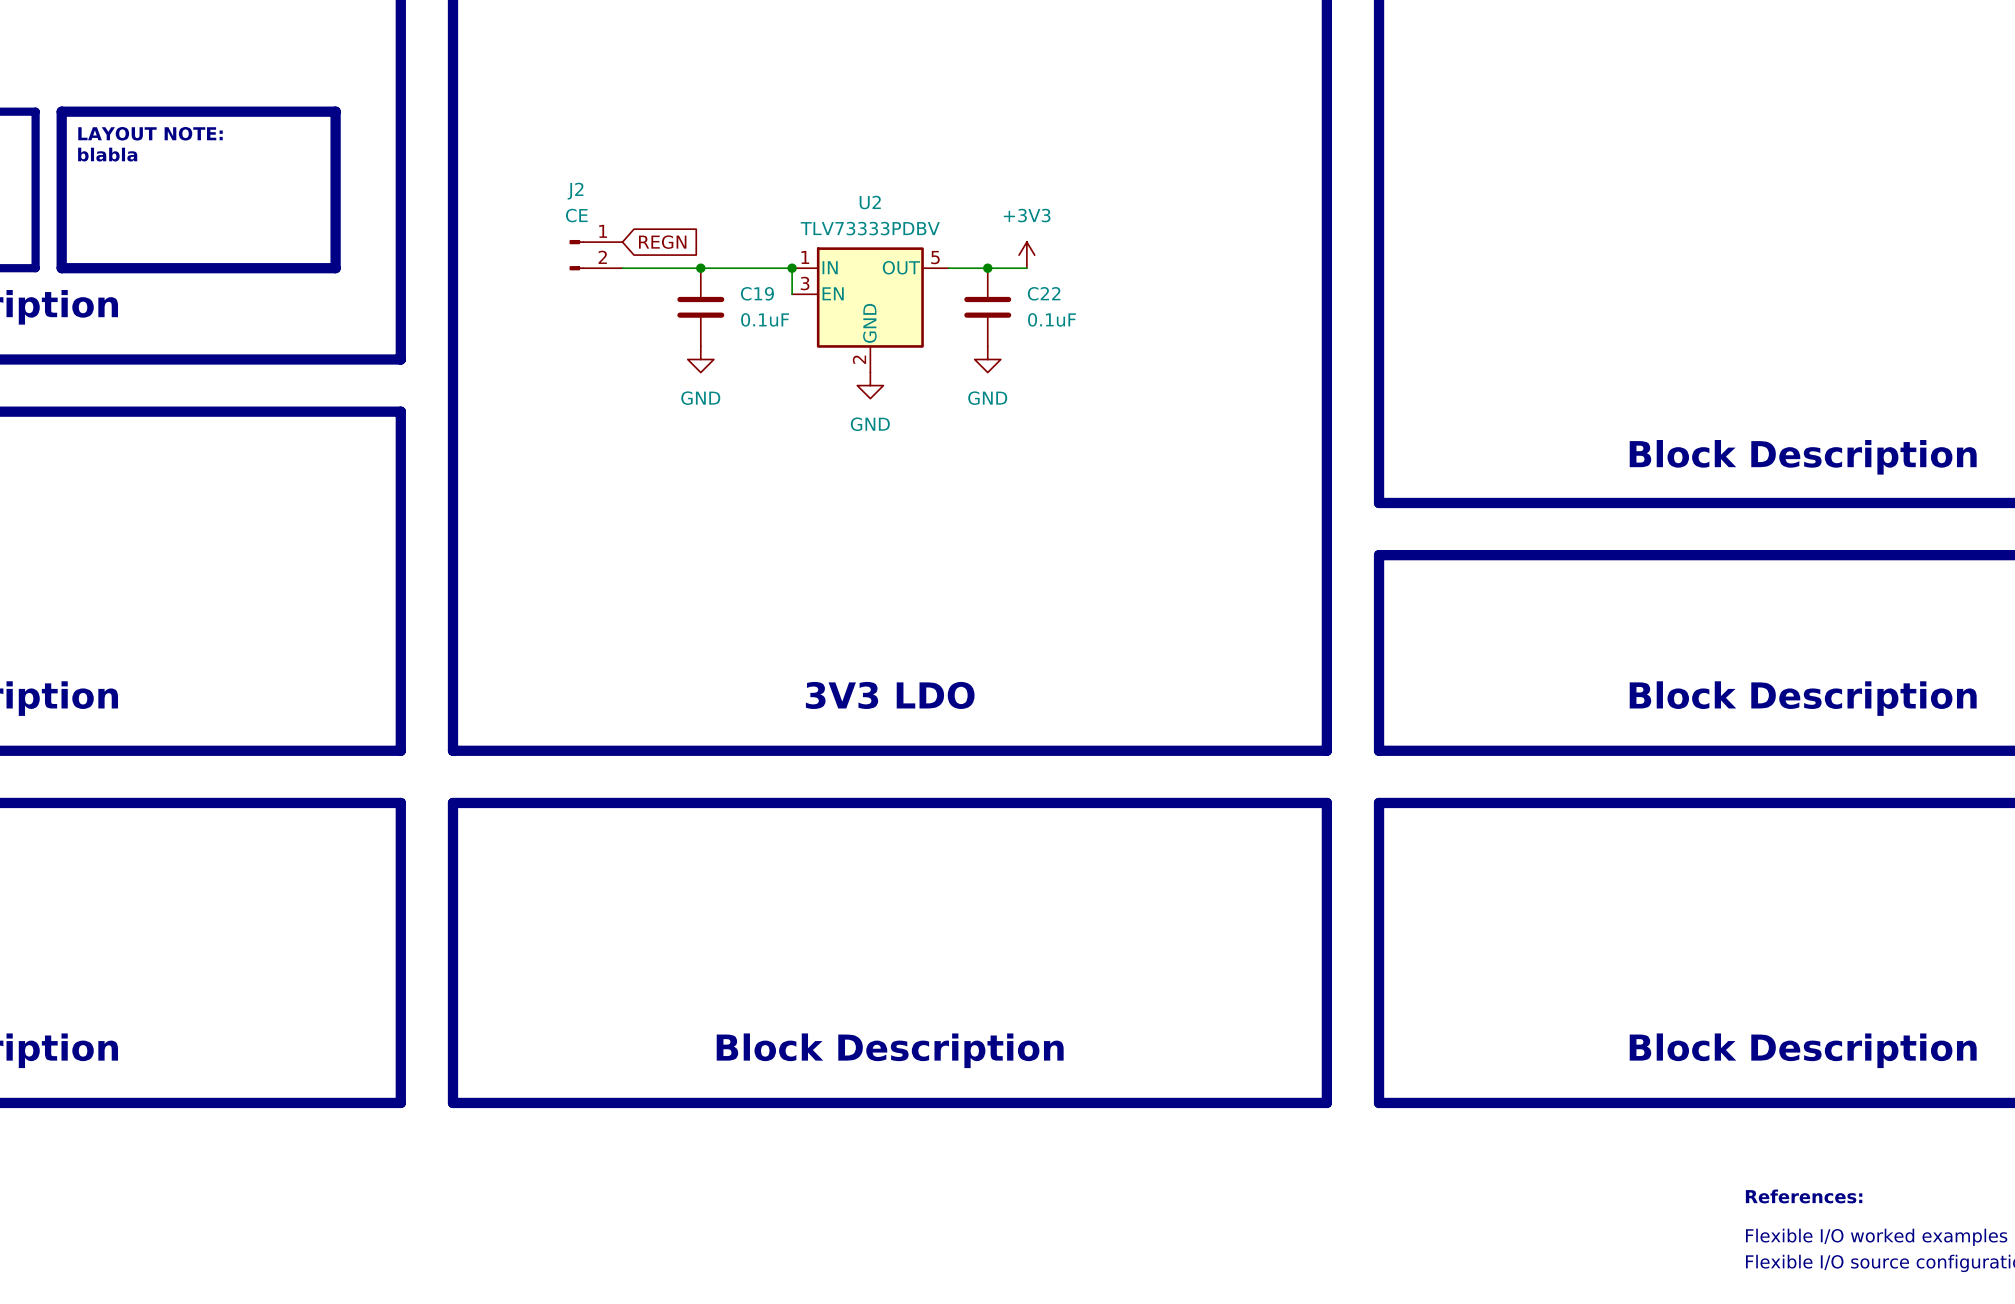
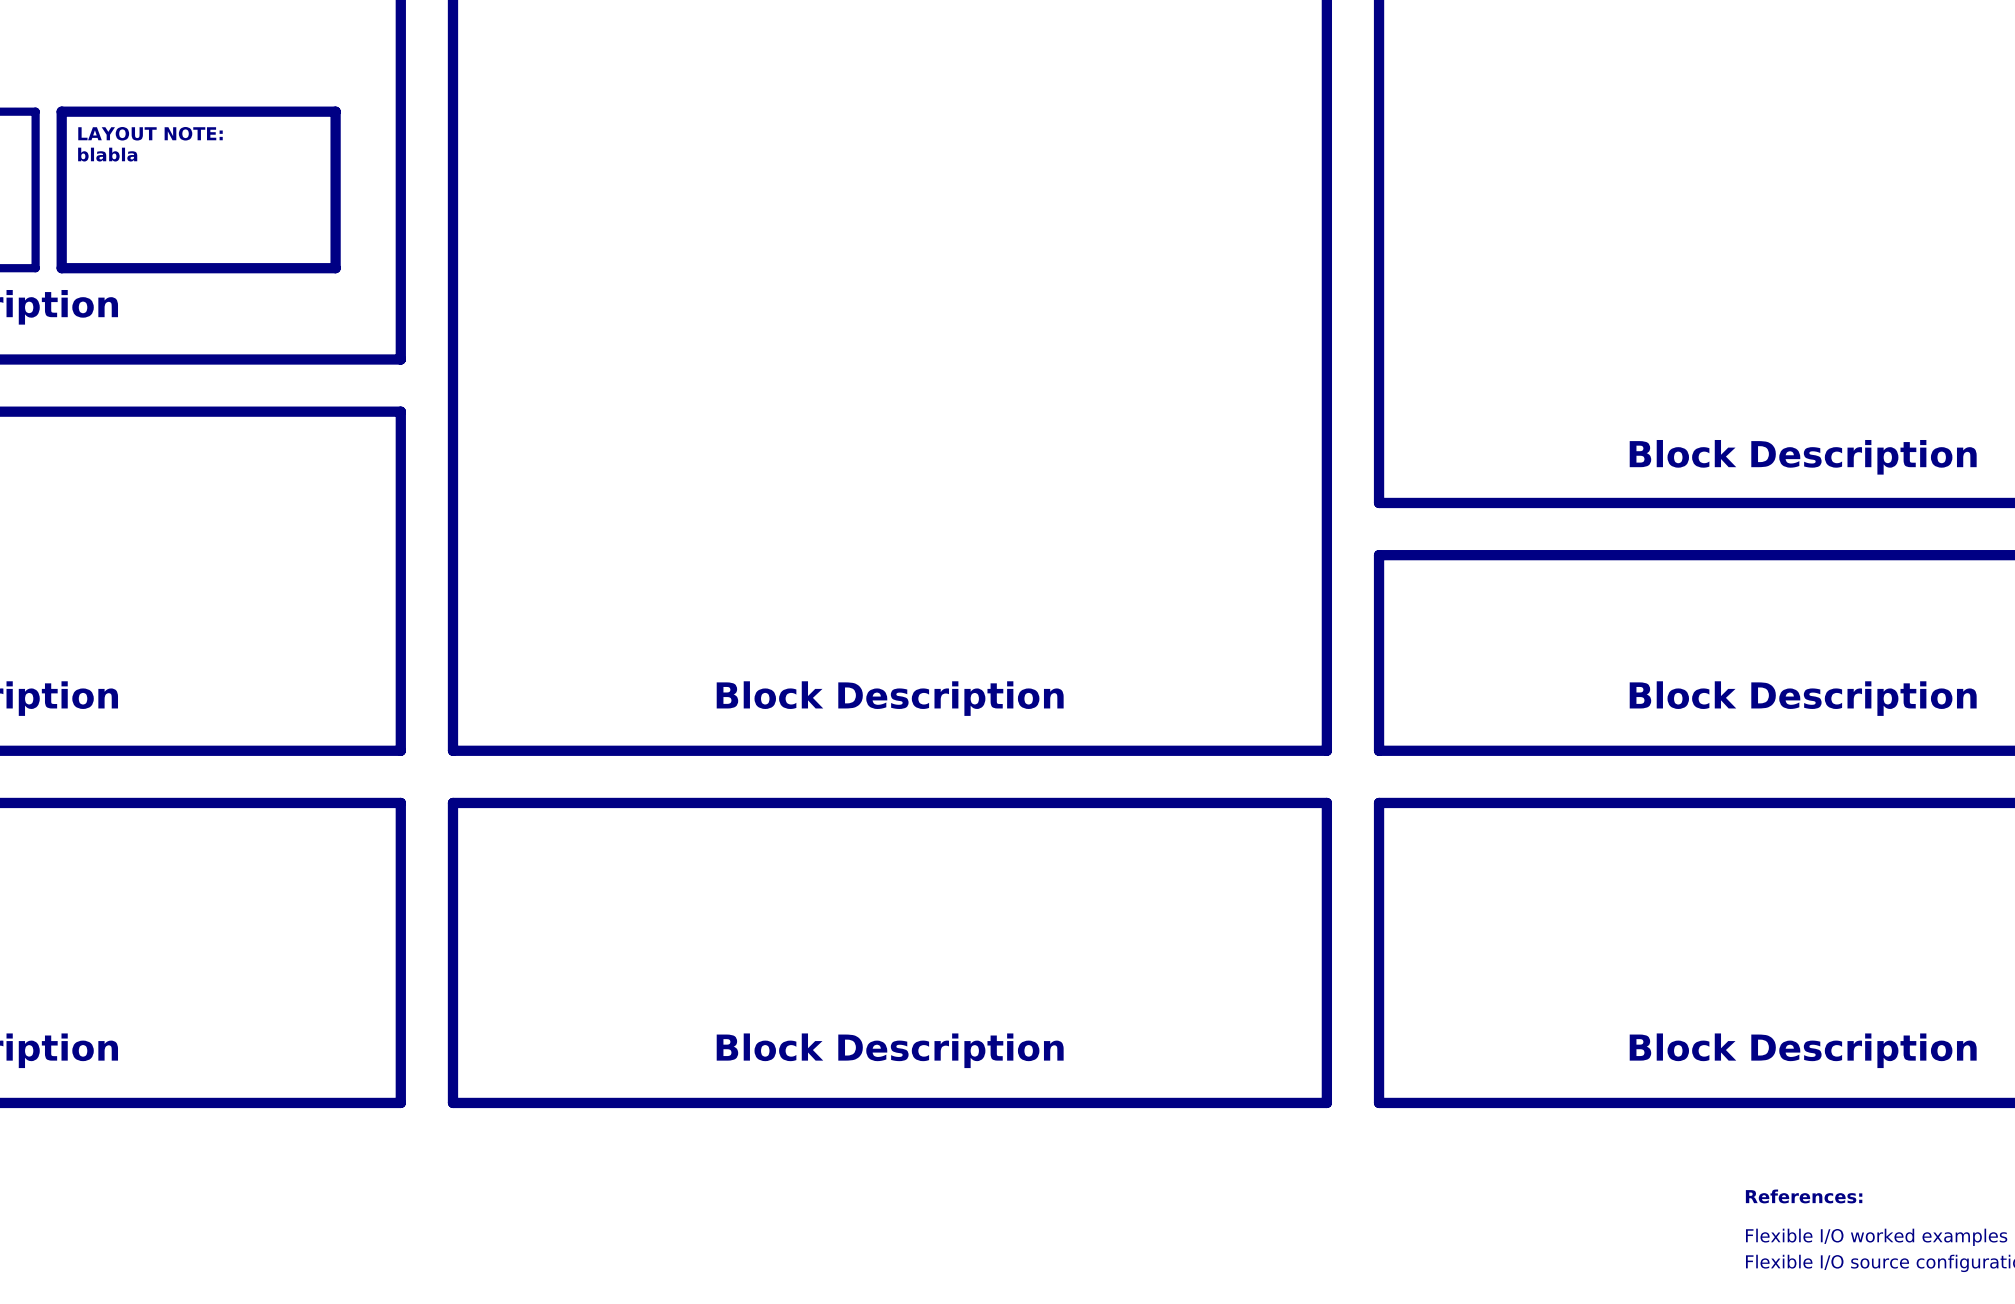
global label: REGN (662, 242) -> none
J2: CE (596, 255) -> none
power symbol: +3V3 (1026, 255) -> none
wire: (622, 268) (792, 268) (792, 294) -> none
junction: (700, 268) -> none
junction: (792, 268) -> none
wire: (948, 268) (1026, 268) -> none
junction: (987, 268) -> none
C19: 0.1uF (700, 307) -> none
C22: 0.1uF (987, 307) -> none
U2: TLV73333PDBV (870, 309) -> none
power symbol: GND (700, 359) -> none
power symbol: GND (987, 359) -> none
power symbol: GND (870, 385) -> none
text: 3V3 LDO (890, 695) -> Block Description (890, 698)

